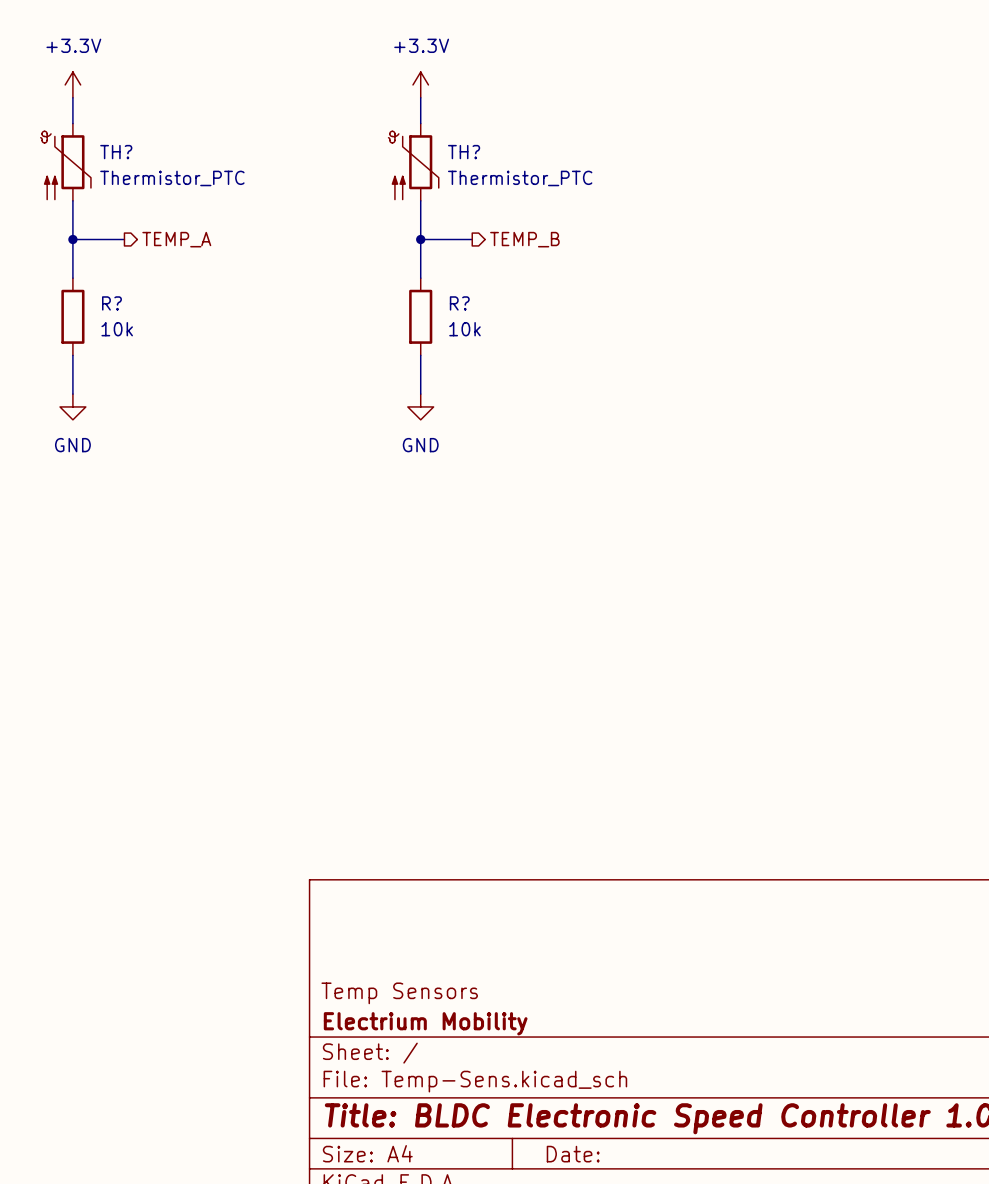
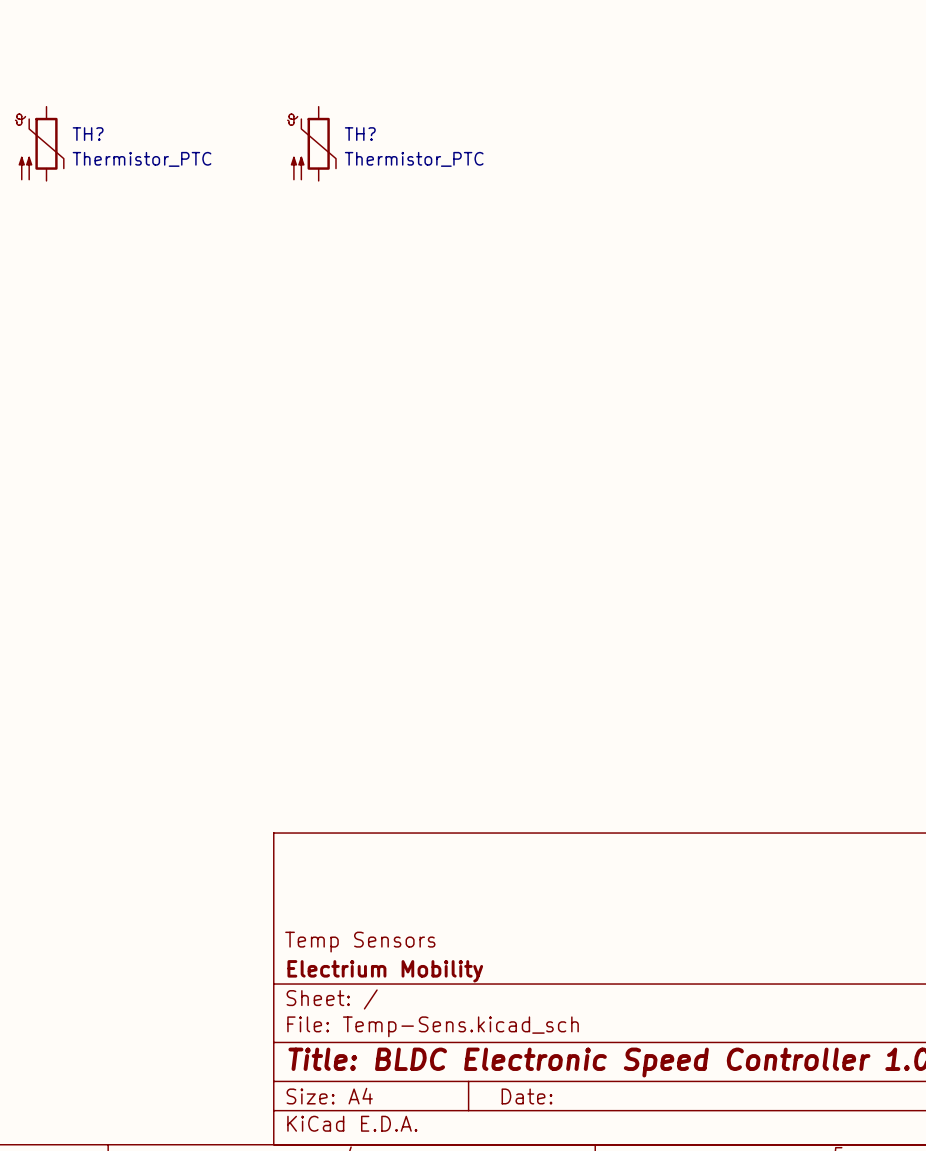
power symbol: +3.3V (72, 84) -> none
power symbol: +3.3V (420, 84) -> none
wire: (72, 97) (72, 123) -> none
wire: (420, 97) (420, 123) -> none
TH? position: (413, 162) -> (311, 143)
wire: (72, 200) (72, 278) -> none
wire: (420, 200) (420, 278) -> none
wire: (72, 239) (124, 239) -> none
junction: (72, 239) -> none
hierarchical label: TEMP_A (176, 239) -> none
wire: (420, 239) (472, 239) -> none
junction: (420, 239) -> none
hierarchical label: TEMP_B (524, 239) -> none
R?: 10k (72, 316) -> none
R?: 10k (420, 316) -> none
wire: (72, 355) (72, 394) -> none
wire: (420, 355) (420, 394) -> none
power symbol: GND (72, 406) -> none
power symbol: GND (420, 406) -> none

